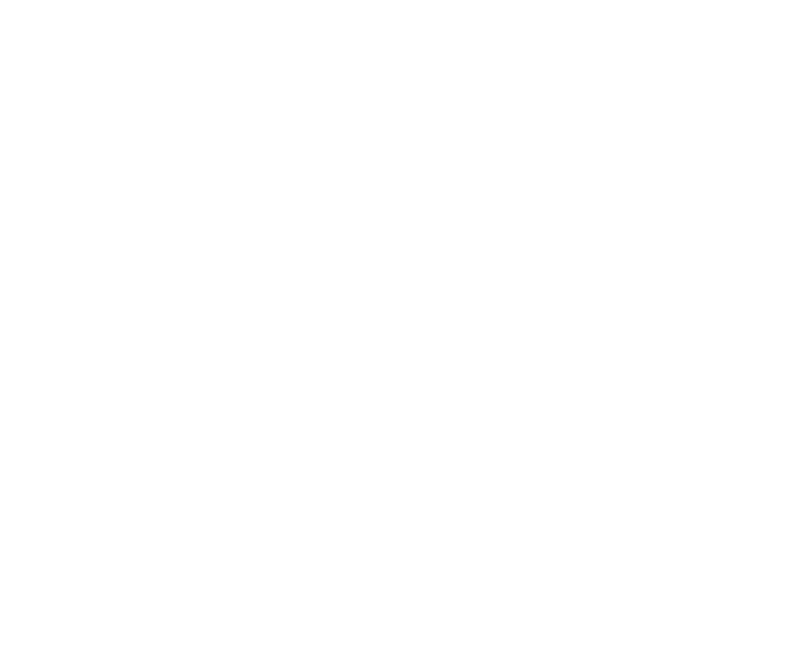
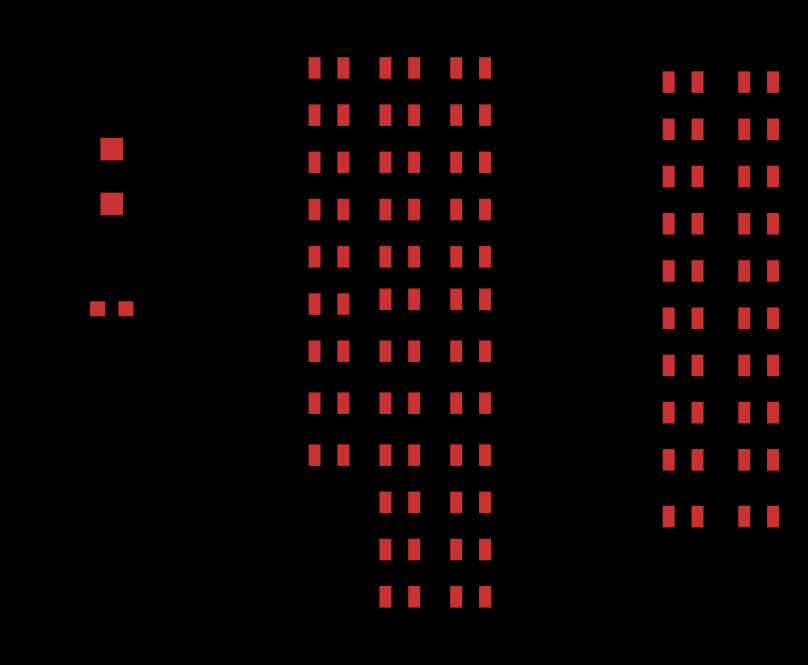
part: none -> (328, 67)
part: none -> (399, 67)
part: none -> (470, 67)
part: none -> (683, 82)
part: none -> (758, 82)
part: none -> (328, 115)
part: none -> (399, 115)
part: none -> (470, 115)
part: none -> (683, 129)
part: none -> (758, 129)
part: none -> (328, 162)
part: none -> (399, 162)
part: none -> (470, 162)
part: none -> (111, 176)
part: none -> (683, 176)
part: none -> (758, 176)
part: none -> (328, 209)
part: none -> (399, 209)
part: none -> (470, 209)
part: none -> (683, 223)
part: none -> (758, 223)
part: none -> (328, 256)
part: none -> (399, 256)
part: none -> (470, 256)
part: none -> (683, 270)
part: none -> (758, 270)
part: none -> (399, 299)
part: none -> (470, 299)
part: none -> (328, 304)
part: none -> (111, 308)
part: none -> (683, 318)
part: none -> (758, 318)
part: none -> (328, 351)
part: none -> (399, 351)
part: none -> (470, 351)
part: none -> (683, 365)
part: none -> (758, 365)
part: none -> (328, 403)
part: none -> (399, 403)
part: none -> (470, 403)
part: none -> (683, 412)
part: none -> (758, 412)
part: none -> (328, 455)
part: none -> (399, 455)
part: none -> (470, 455)
part: none -> (683, 459)
part: none -> (758, 459)
part: none -> (399, 502)
part: none -> (470, 502)
part: none -> (683, 516)
part: none -> (758, 516)
part: none -> (399, 549)
part: none -> (470, 549)
part: none -> (399, 596)
part: none -> (470, 596)

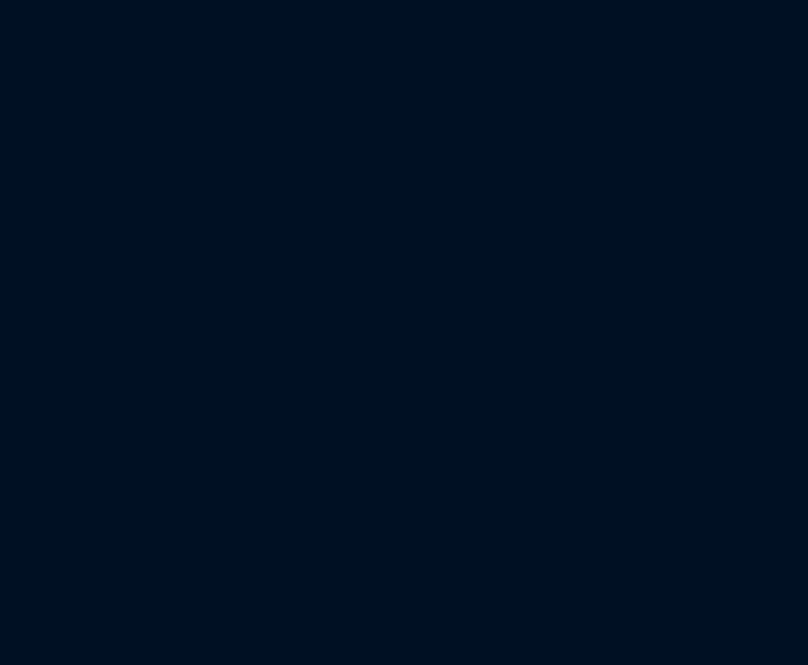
part: (328, 67) -> none
part: (399, 67) -> none
part: (470, 67) -> none
part: (683, 82) -> none
part: (758, 82) -> none
part: (328, 115) -> none
part: (399, 115) -> none
part: (470, 115) -> none
part: (683, 129) -> none
part: (758, 129) -> none
part: (328, 162) -> none
part: (399, 162) -> none
part: (470, 162) -> none
part: (111, 176) -> none
part: (683, 176) -> none
part: (758, 176) -> none
part: (328, 209) -> none
part: (399, 209) -> none
part: (470, 209) -> none
part: (683, 223) -> none
part: (758, 223) -> none
part: (328, 256) -> none
part: (399, 256) -> none
part: (470, 256) -> none
part: (683, 270) -> none
part: (758, 270) -> none
part: (399, 299) -> none
part: (470, 299) -> none
part: (328, 304) -> none
part: (111, 308) -> none
part: (683, 318) -> none
part: (758, 318) -> none
part: (328, 351) -> none
part: (399, 351) -> none
part: (470, 351) -> none
part: (683, 365) -> none
part: (758, 365) -> none
part: (328, 403) -> none
part: (399, 403) -> none
part: (470, 403) -> none
part: (683, 412) -> none
part: (758, 412) -> none
part: (328, 455) -> none
part: (399, 455) -> none
part: (470, 455) -> none
part: (683, 459) -> none
part: (758, 459) -> none
part: (399, 502) -> none
part: (470, 502) -> none
part: (683, 516) -> none
part: (758, 516) -> none
part: (399, 549) -> none
part: (470, 549) -> none
part: (399, 596) -> none
part: (470, 596) -> none

